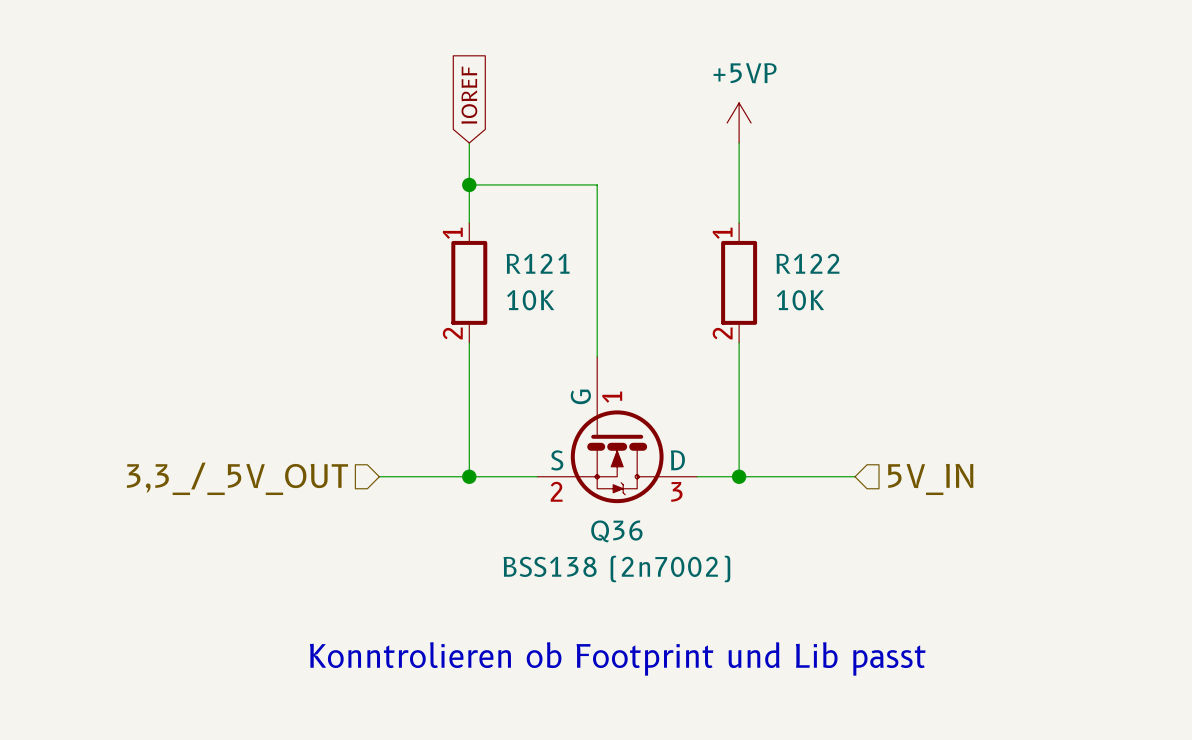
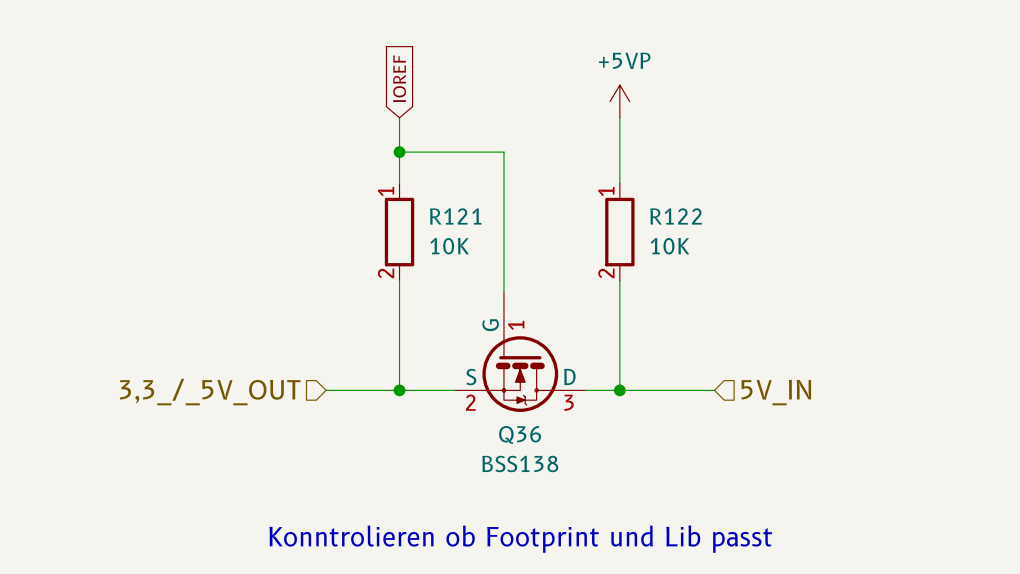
Q36 value: BSS138 (2n7002) (616, 568) -> BSS138 (520, 463)

